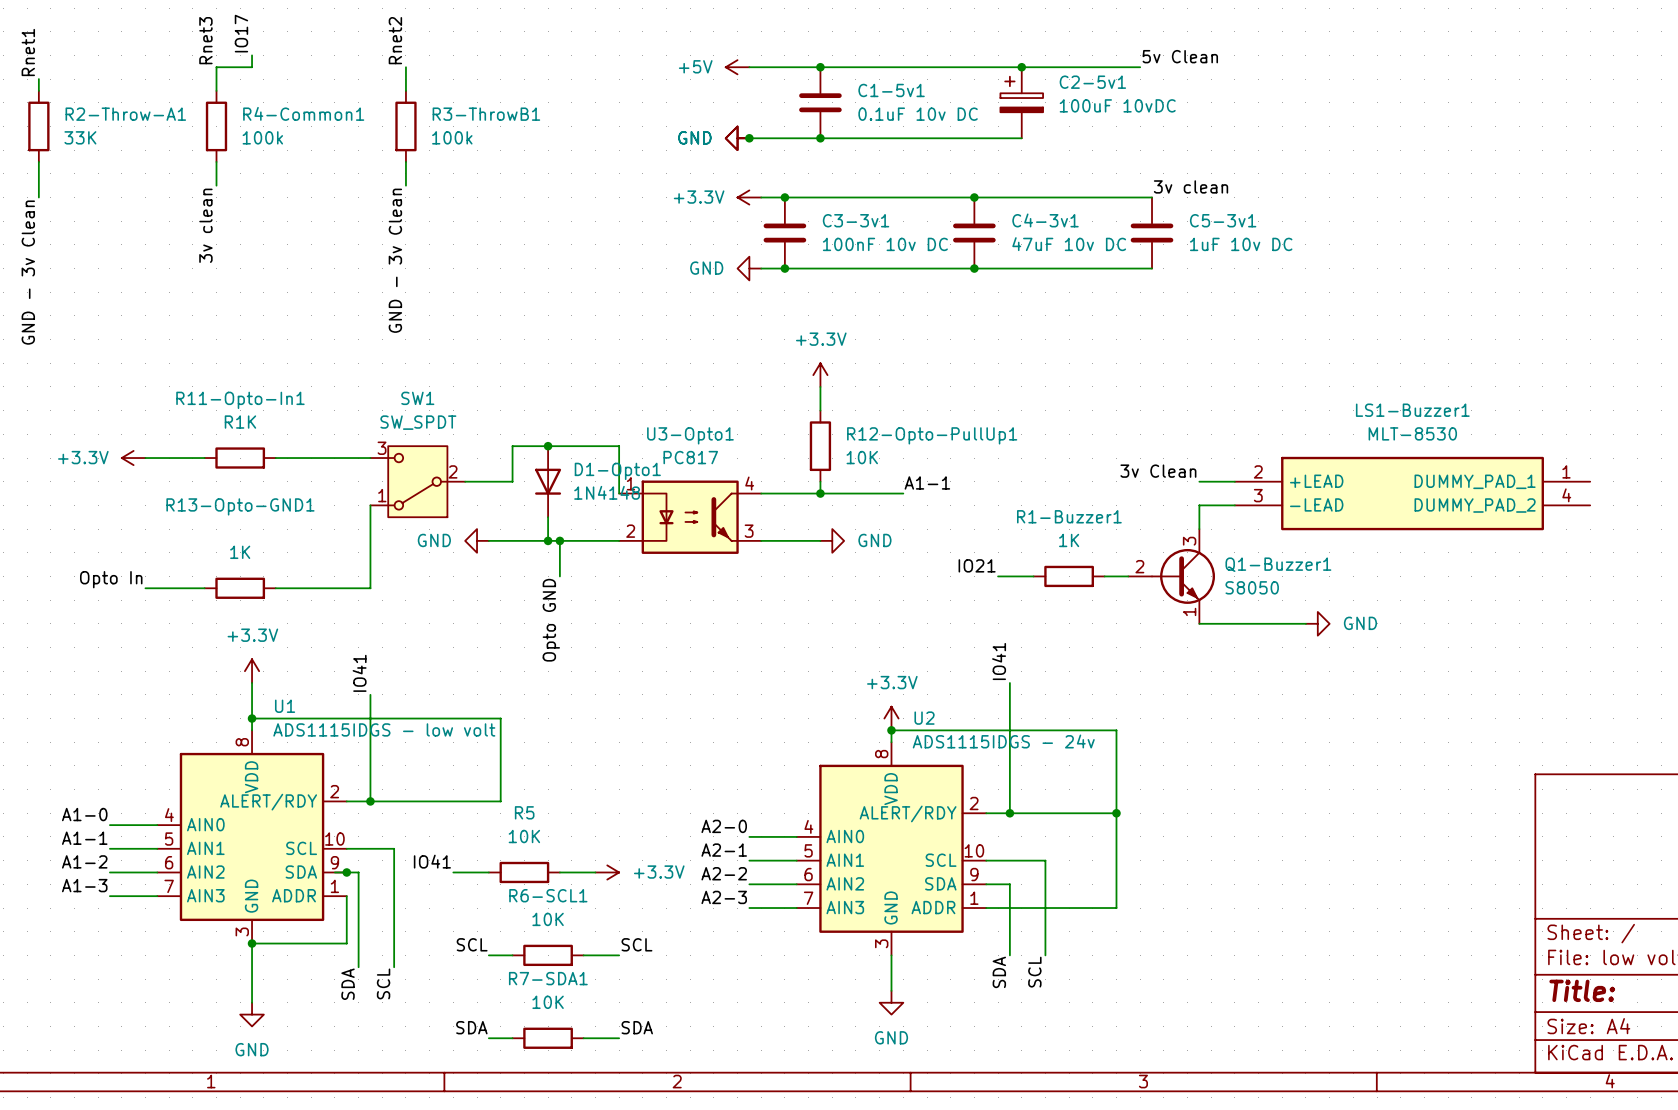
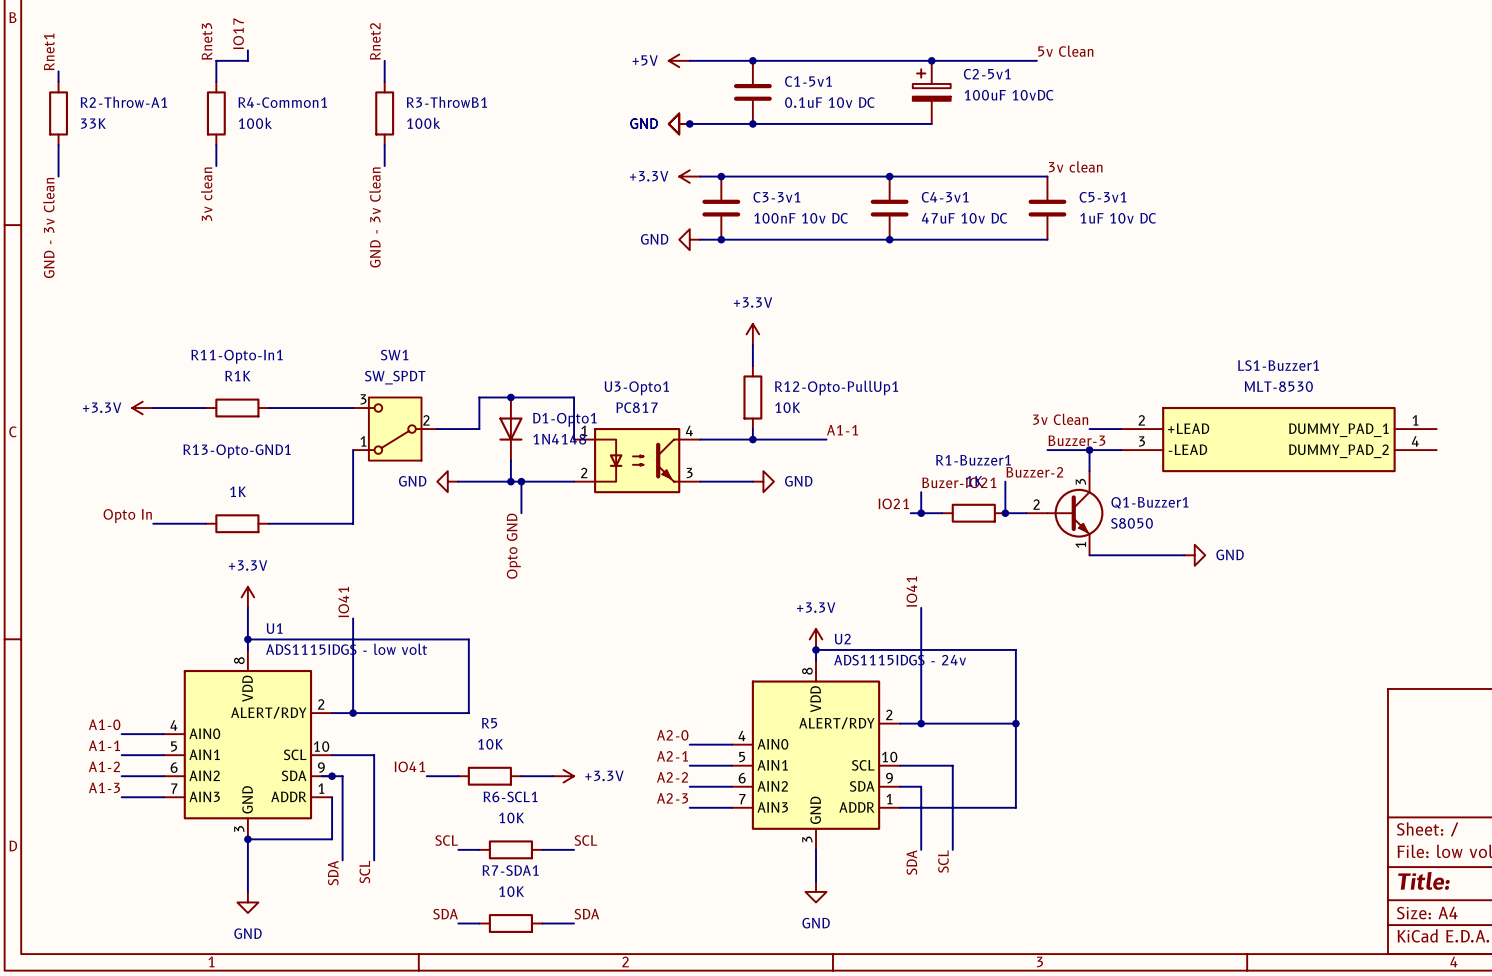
label: none -> Buzzer-3 (1076, 440)
wire: none -> (1047, 450) (1089, 450)
junction: none -> (1089, 450)
label: none -> Buzzer-2 (1034, 472)
wire: none -> (1005, 481) (1005, 513)
label: none -> Buzer-IO21 (959, 482)
wire: none -> (921, 492) (921, 513)
junction: none -> (921, 513)
junction: none -> (1005, 513)

